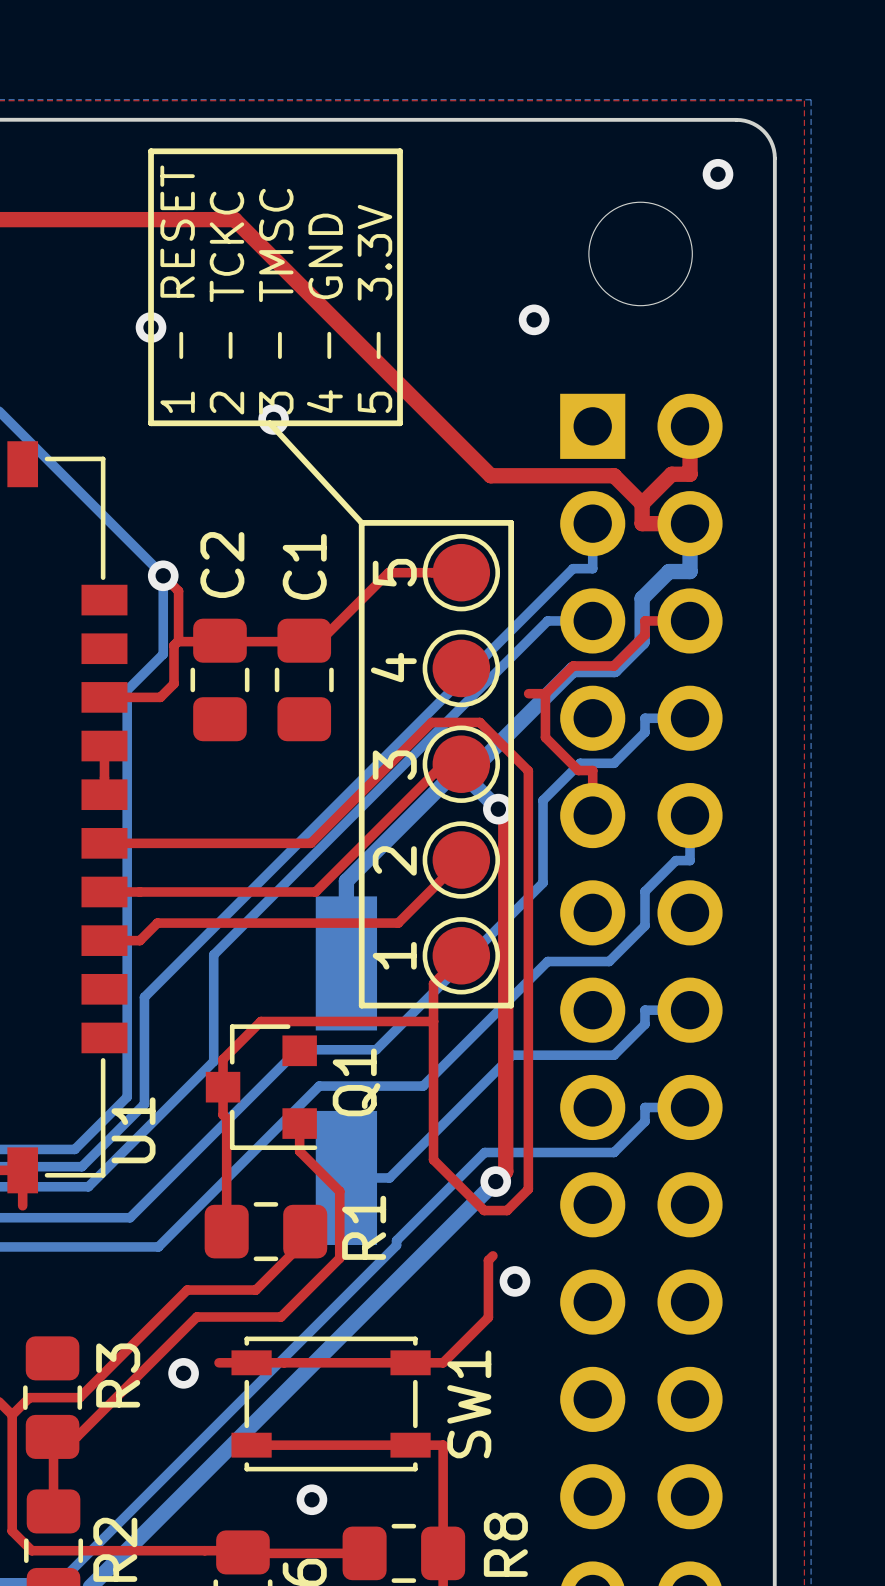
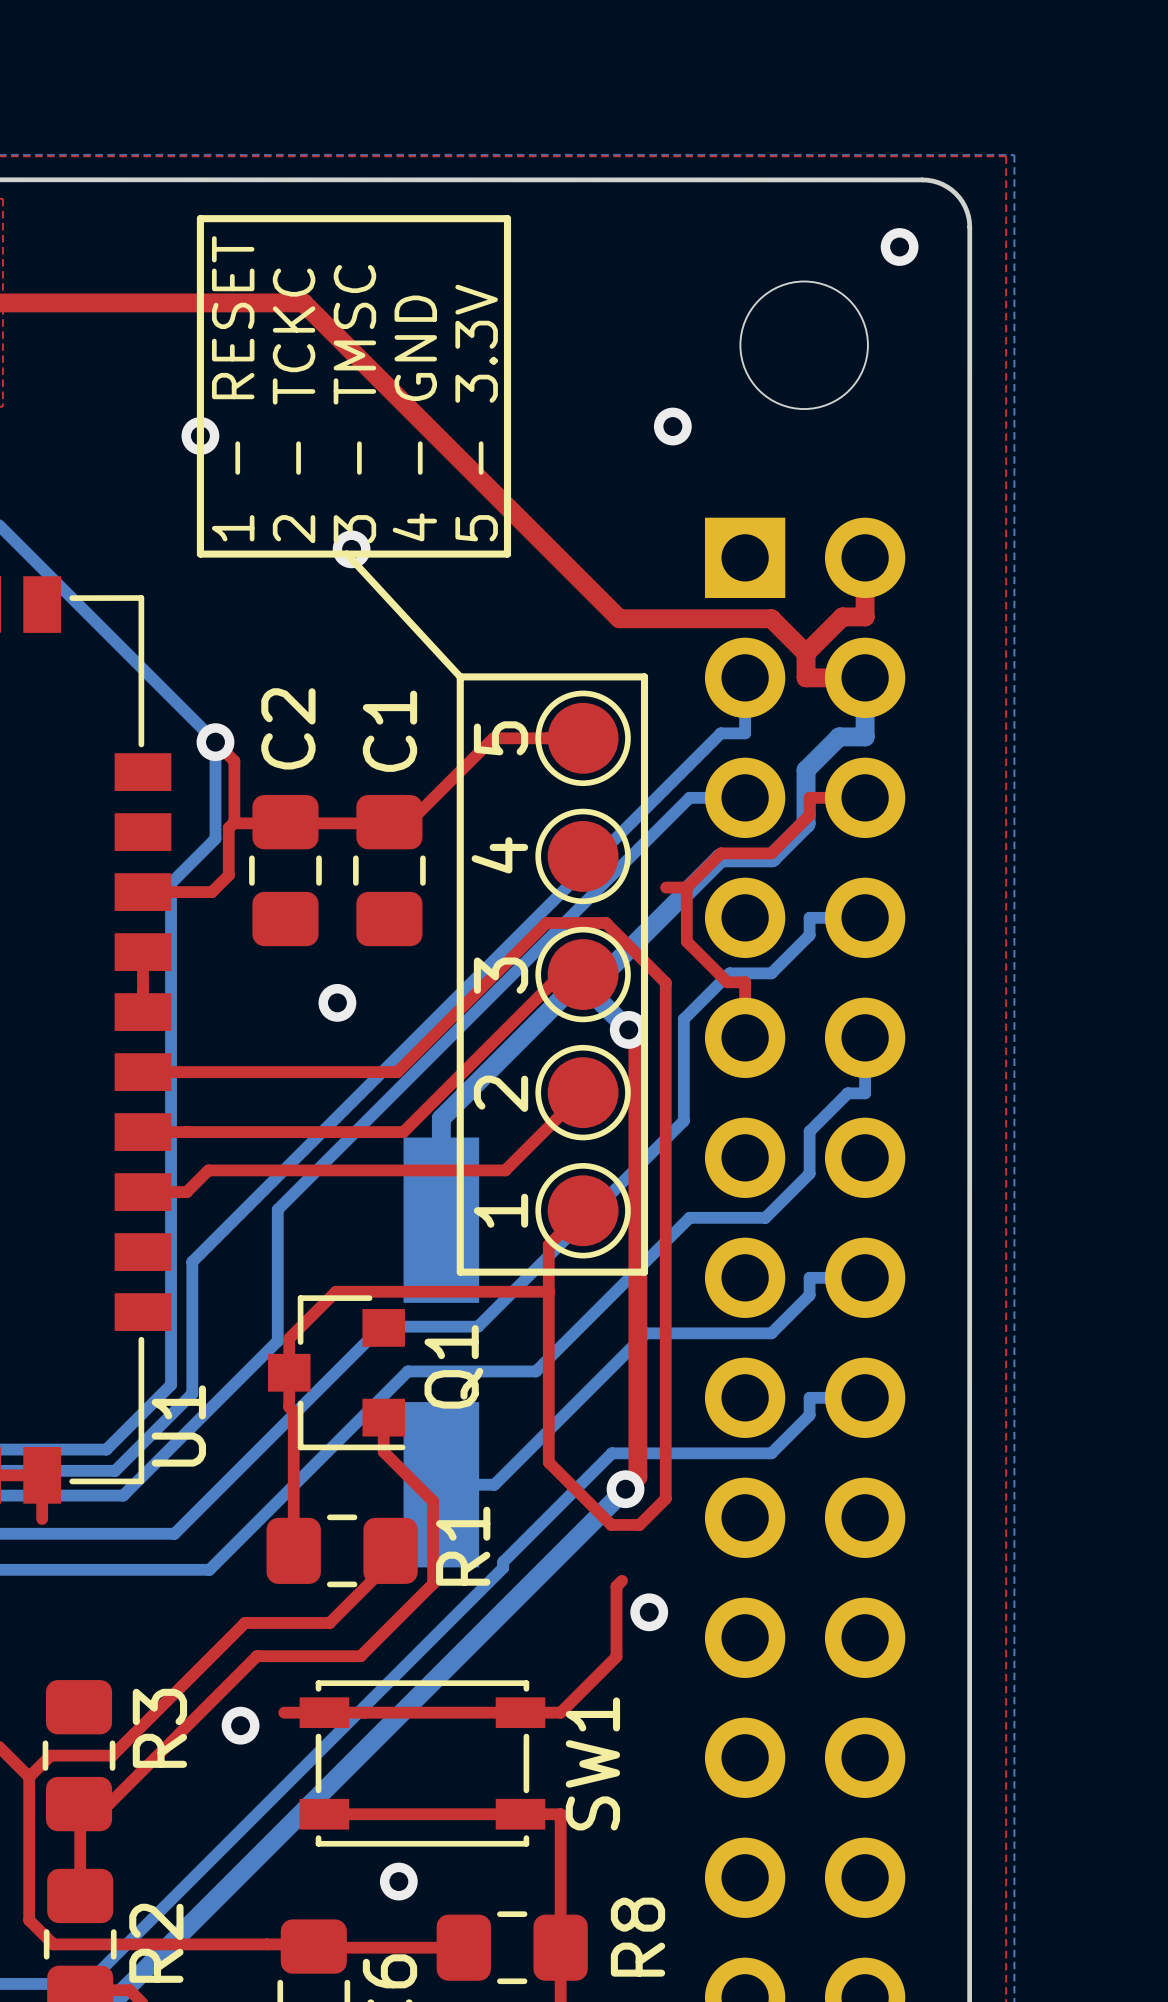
via: none -> (337, 1002)

